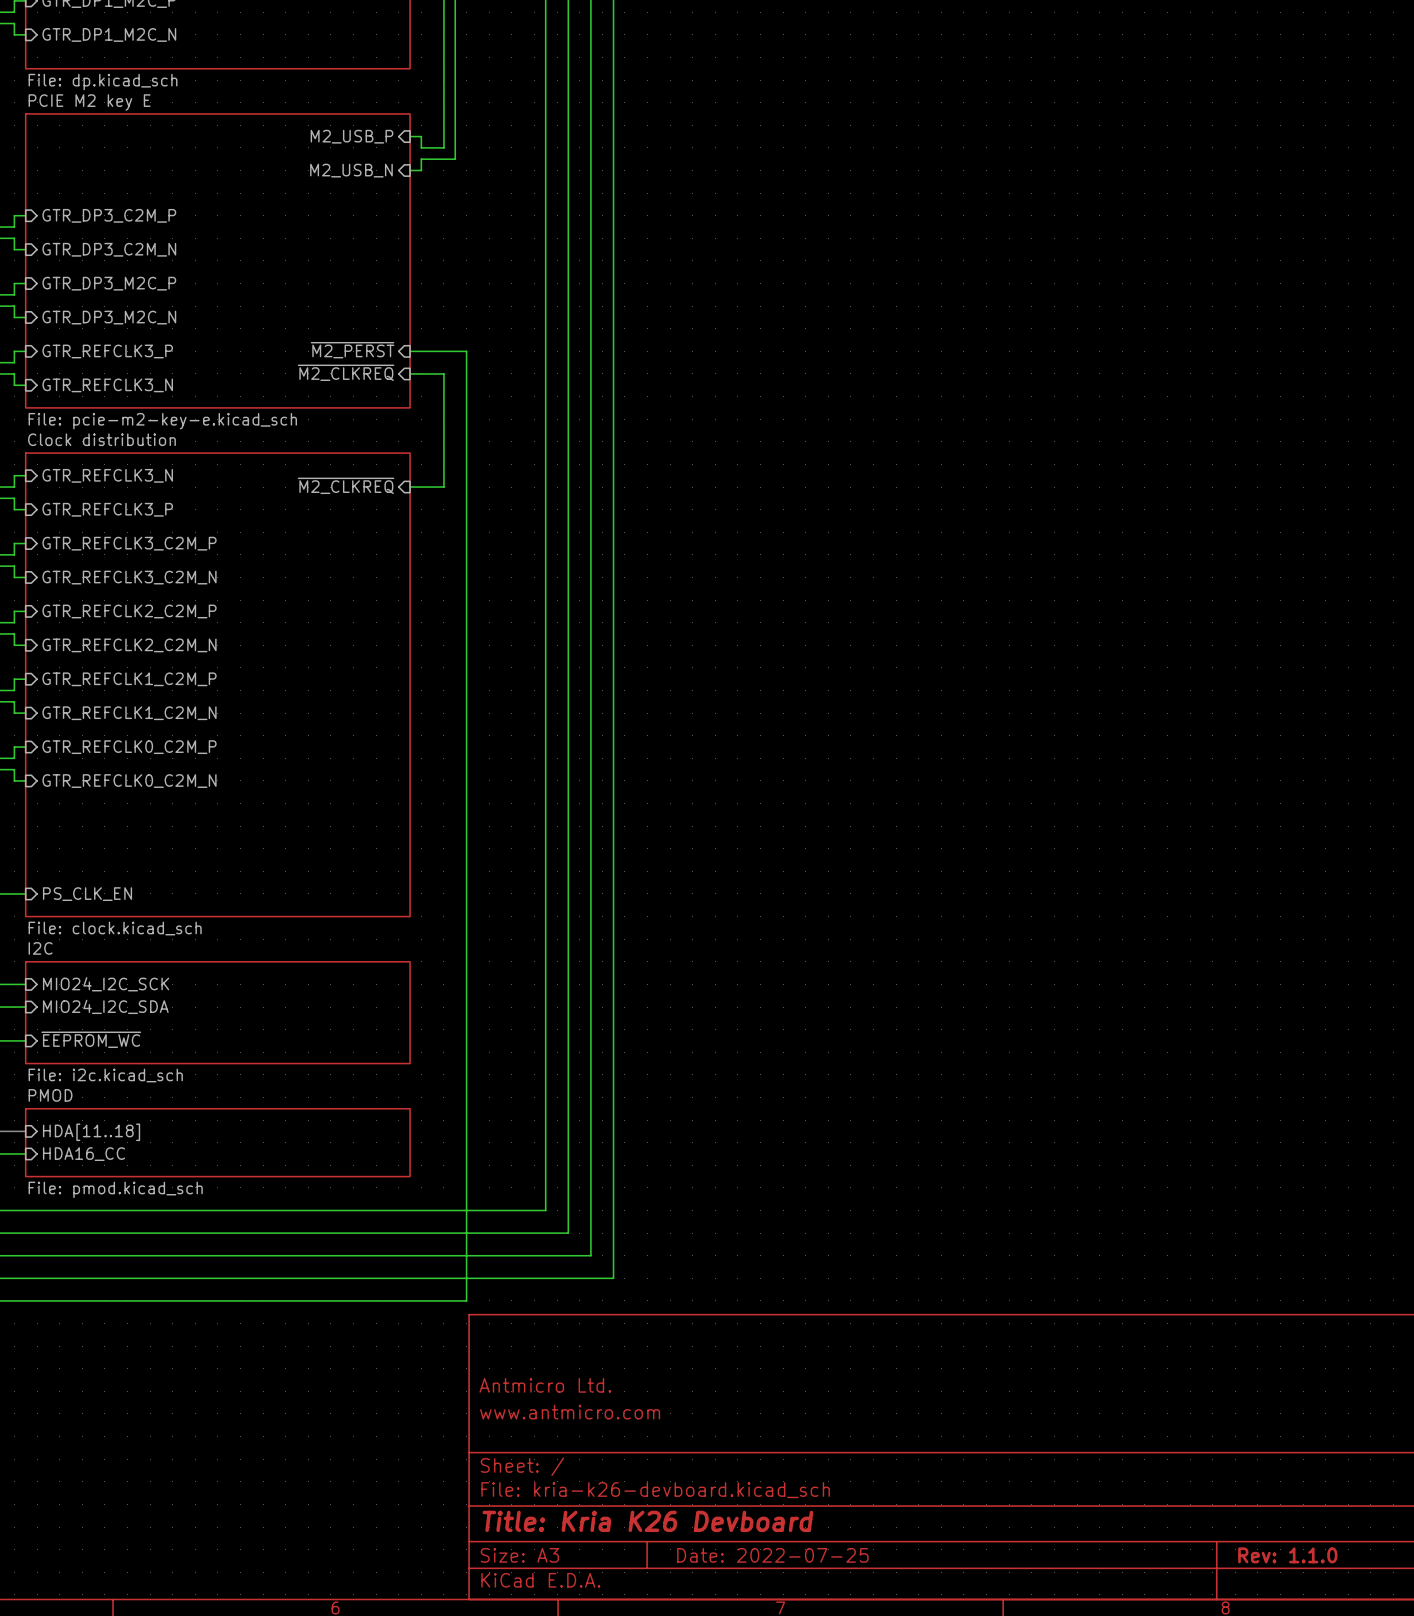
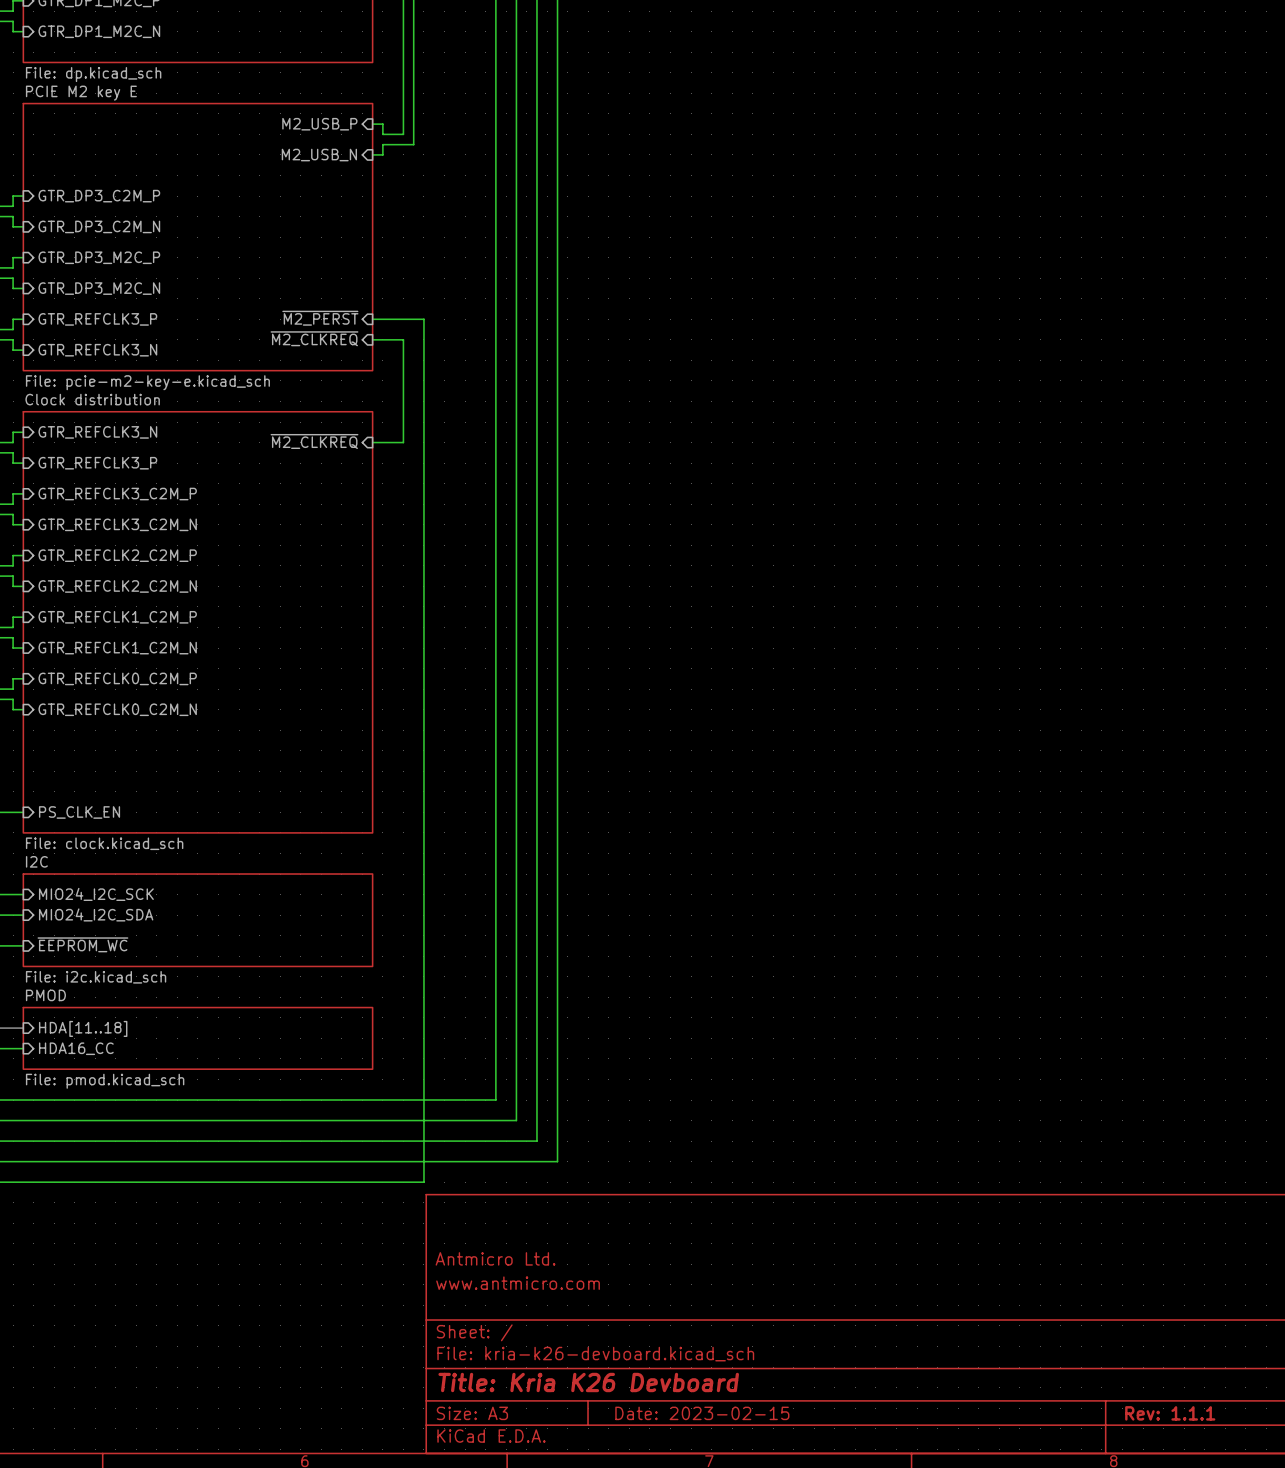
title block: Date: 2022-07-25 (772, 1555) -> Date: 2023-02-15 (702, 1413)
title block: Rev: 1.1.0 (1287, 1555) -> Rev: 1.1.1 (1170, 1413)

